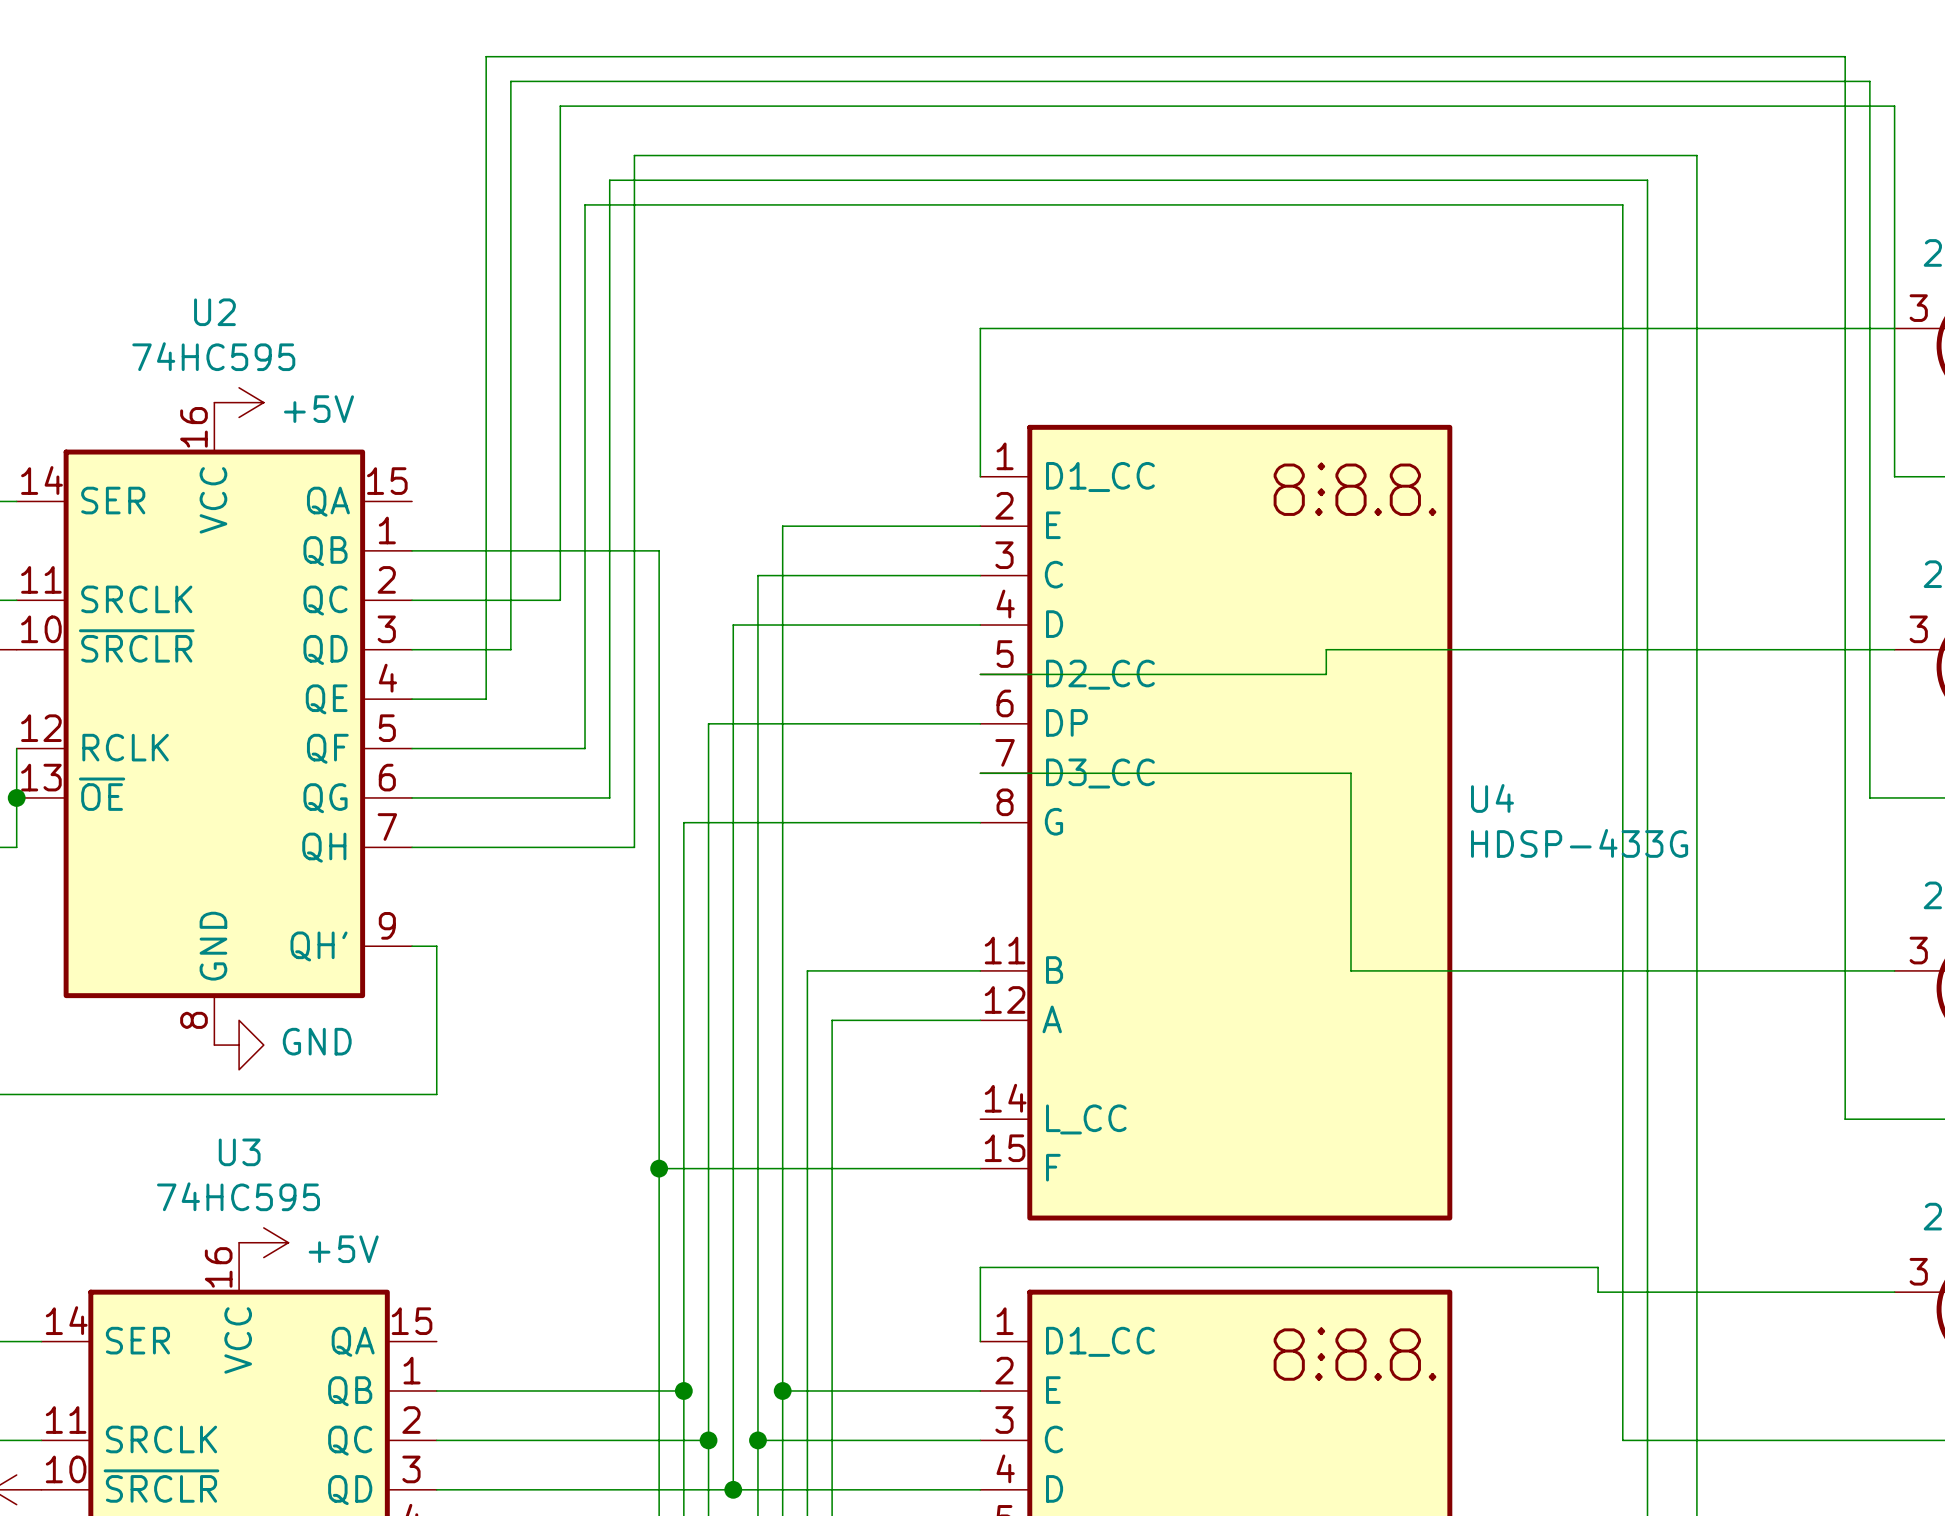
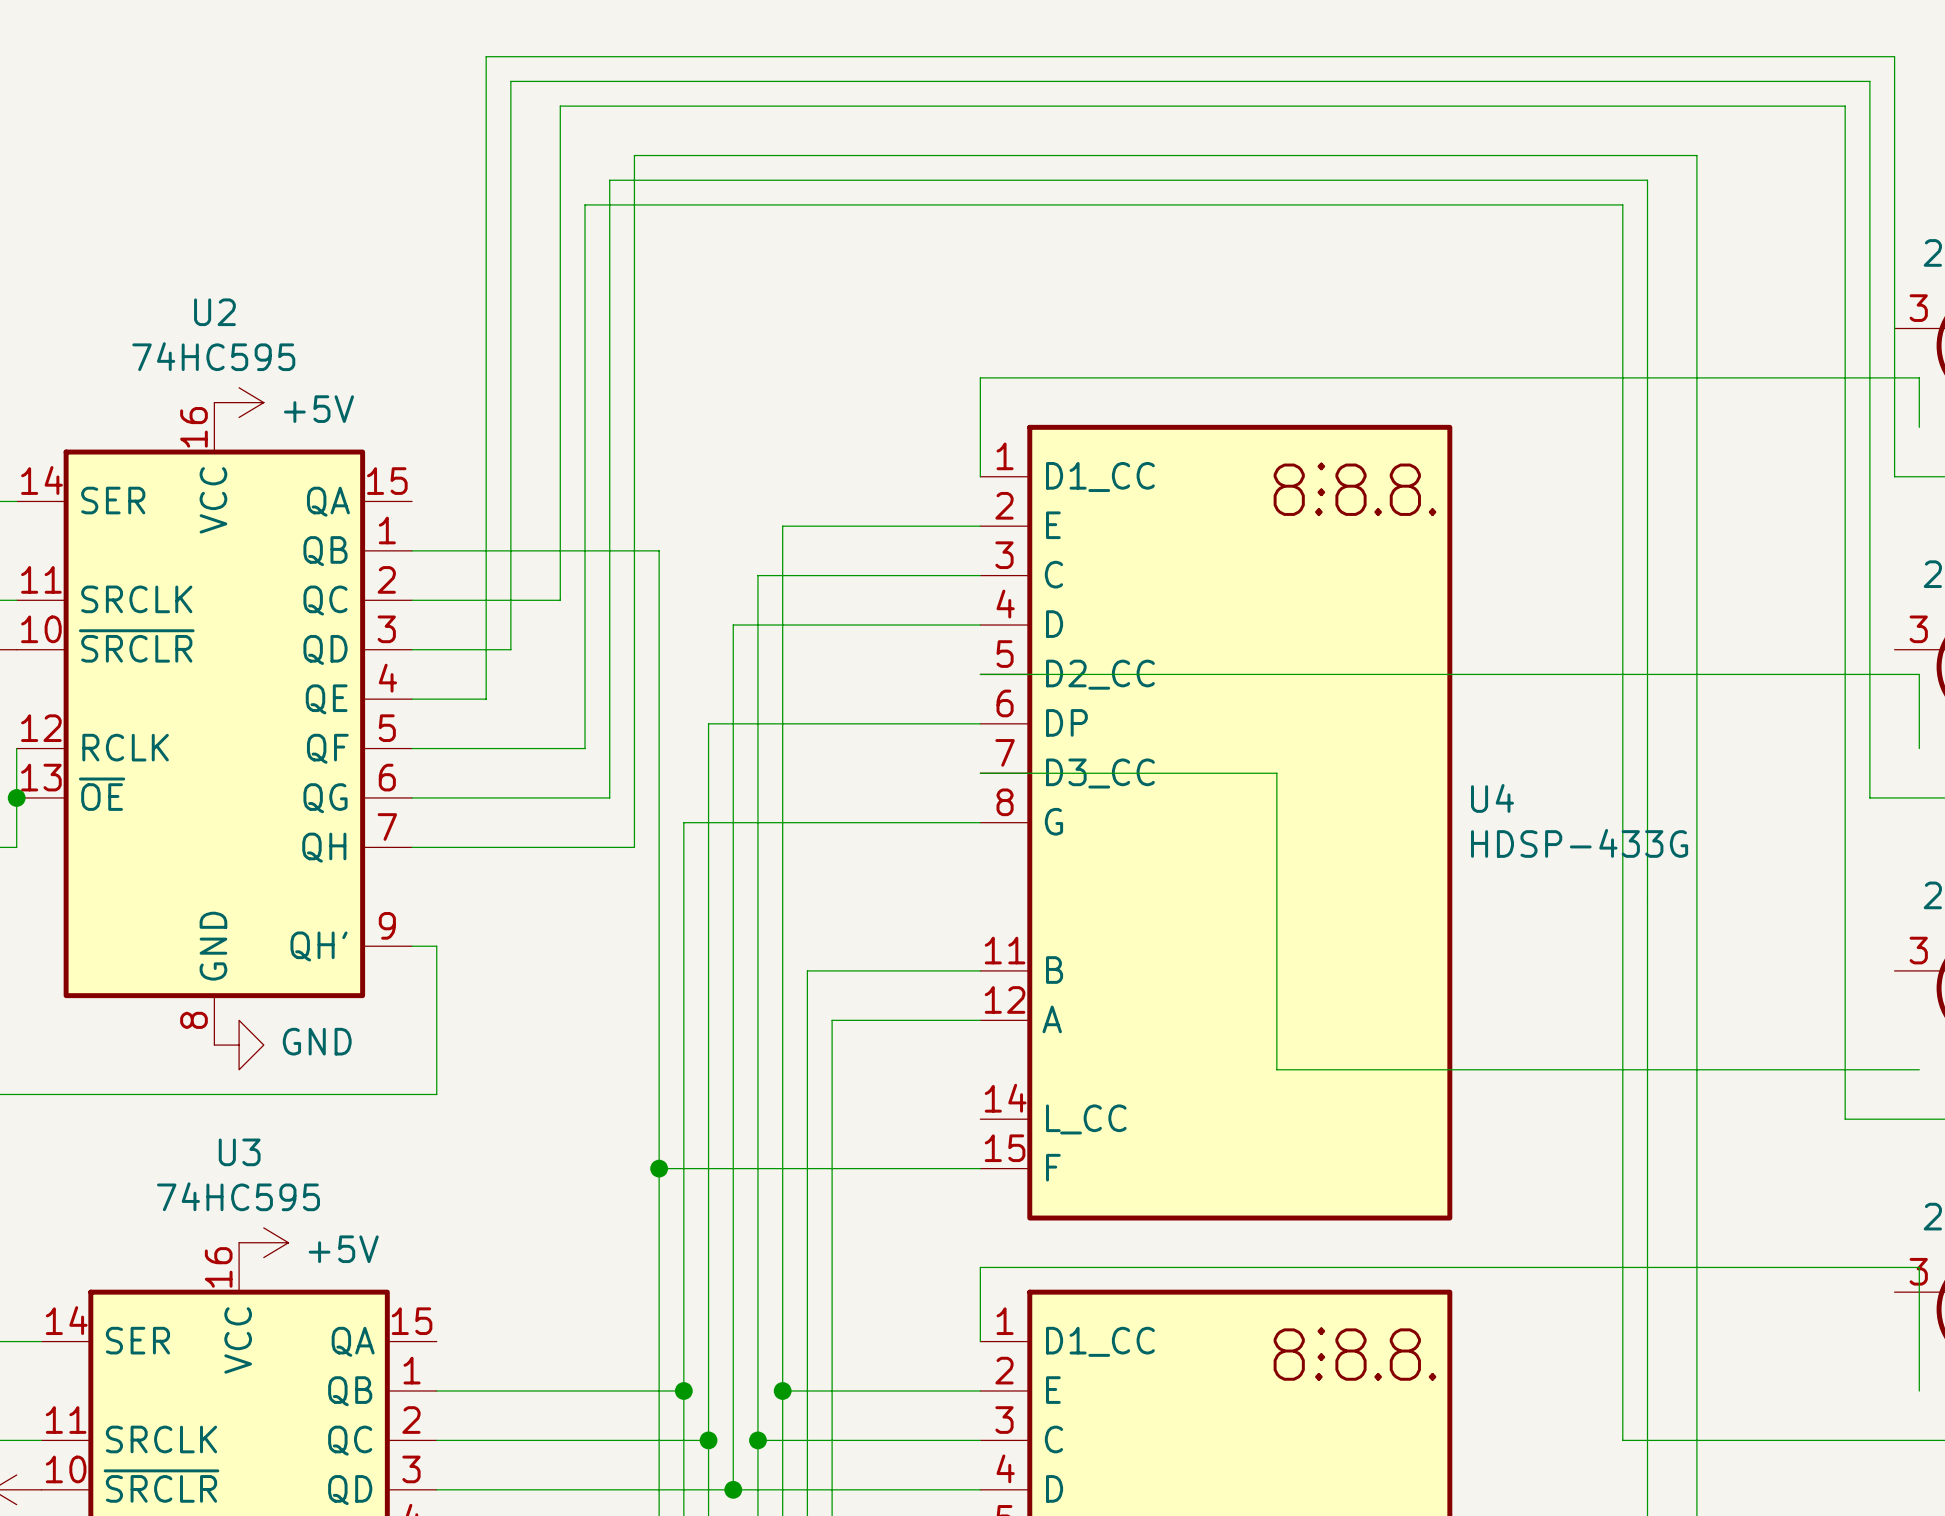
wire: (1845, 56) (1845, 106) (1894, 106) -> (1845, 56) (1894, 56) (1894, 106)
wire: (1894, 328) (980, 328) (980, 377) -> (1919, 427) (1919, 377) (980, 377)
wire: (1894, 649) (1326, 649) (1326, 674) -> (1919, 748) (1919, 674) (1326, 674)
wire: (1276, 773) (1350, 773) (1350, 970) (1894, 970) -> (1276, 773) (1276, 1069) (1919, 1069)
wire: (1598, 1267) (1598, 1292) (1894, 1292) -> (1598, 1267) (1919, 1267) (1919, 1390)

